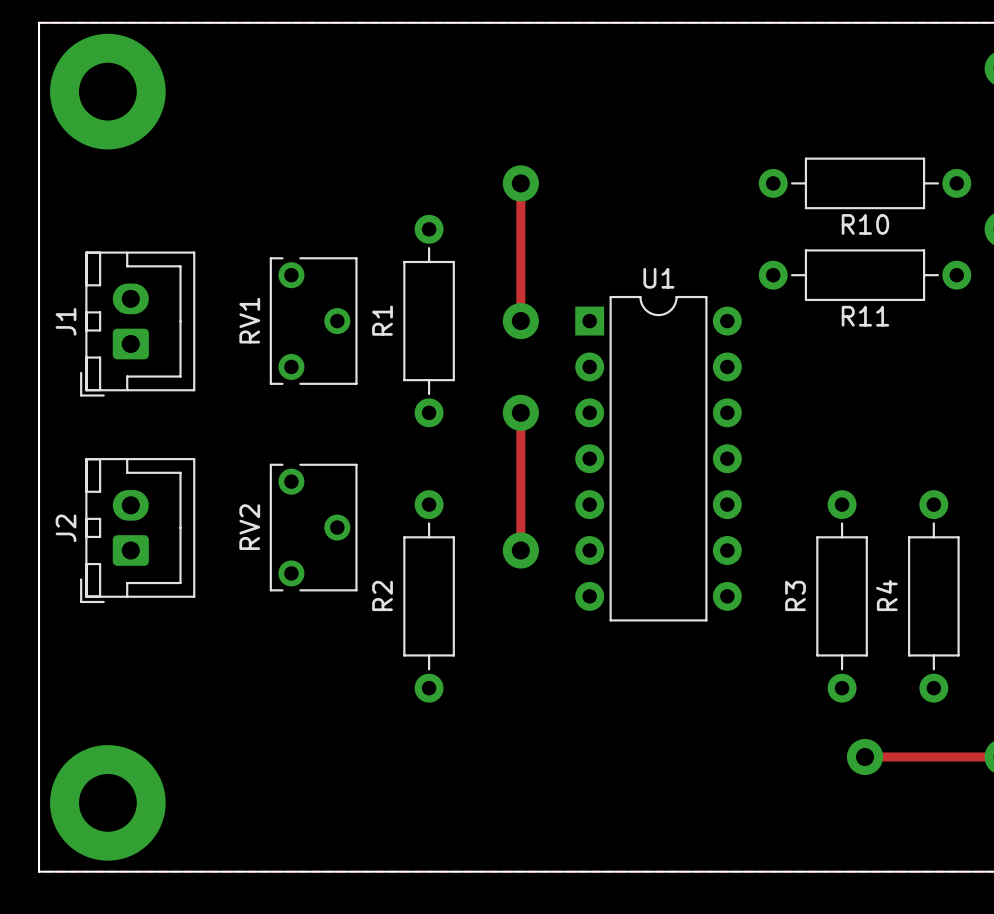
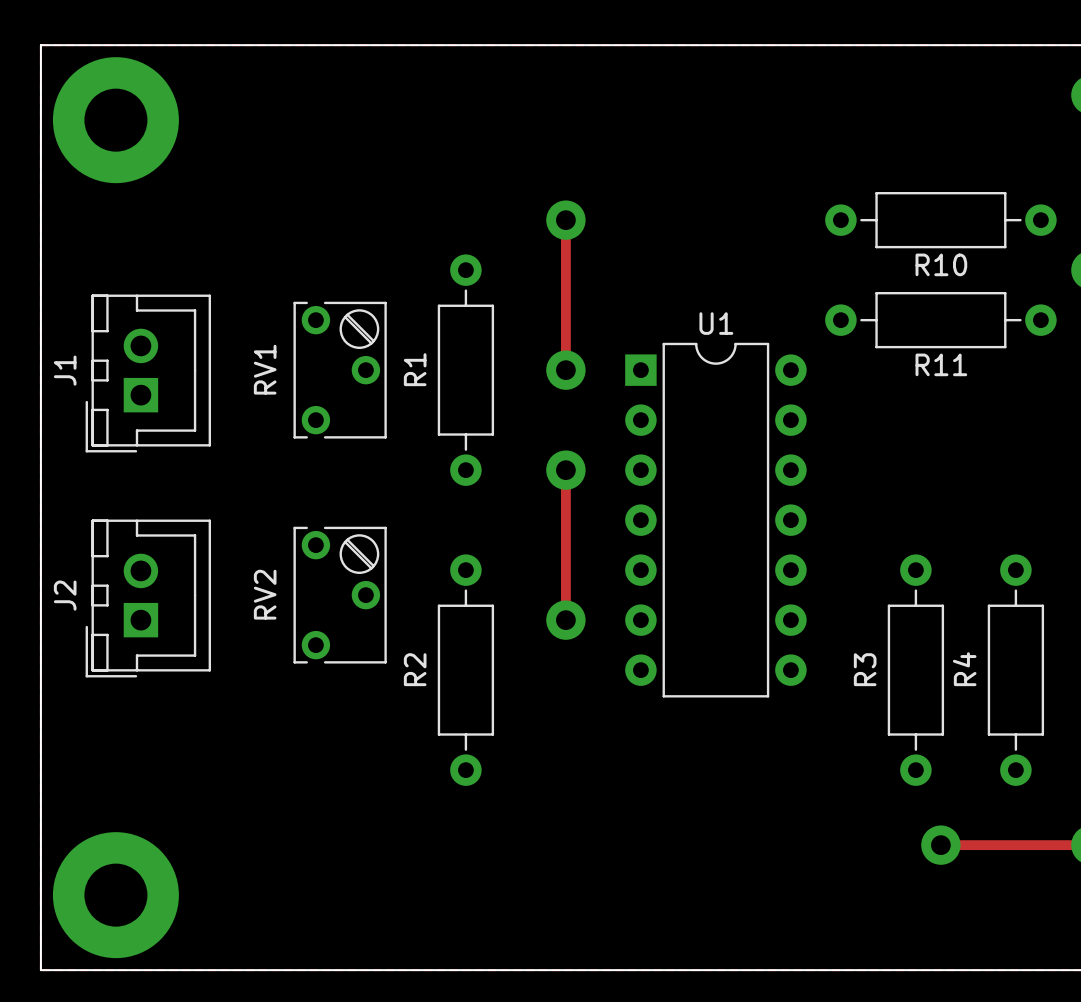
J1 footprint: [80, 251, 196, 397] -> [85, 294, 212, 453]
RV1 footprint: [269, 257, 358, 385] -> [293, 301, 387, 439]
J2 footprint: [80, 458, 196, 604] -> [85, 519, 212, 678]
RV2 footprint: [269, 463, 358, 592] -> [293, 526, 387, 664]

